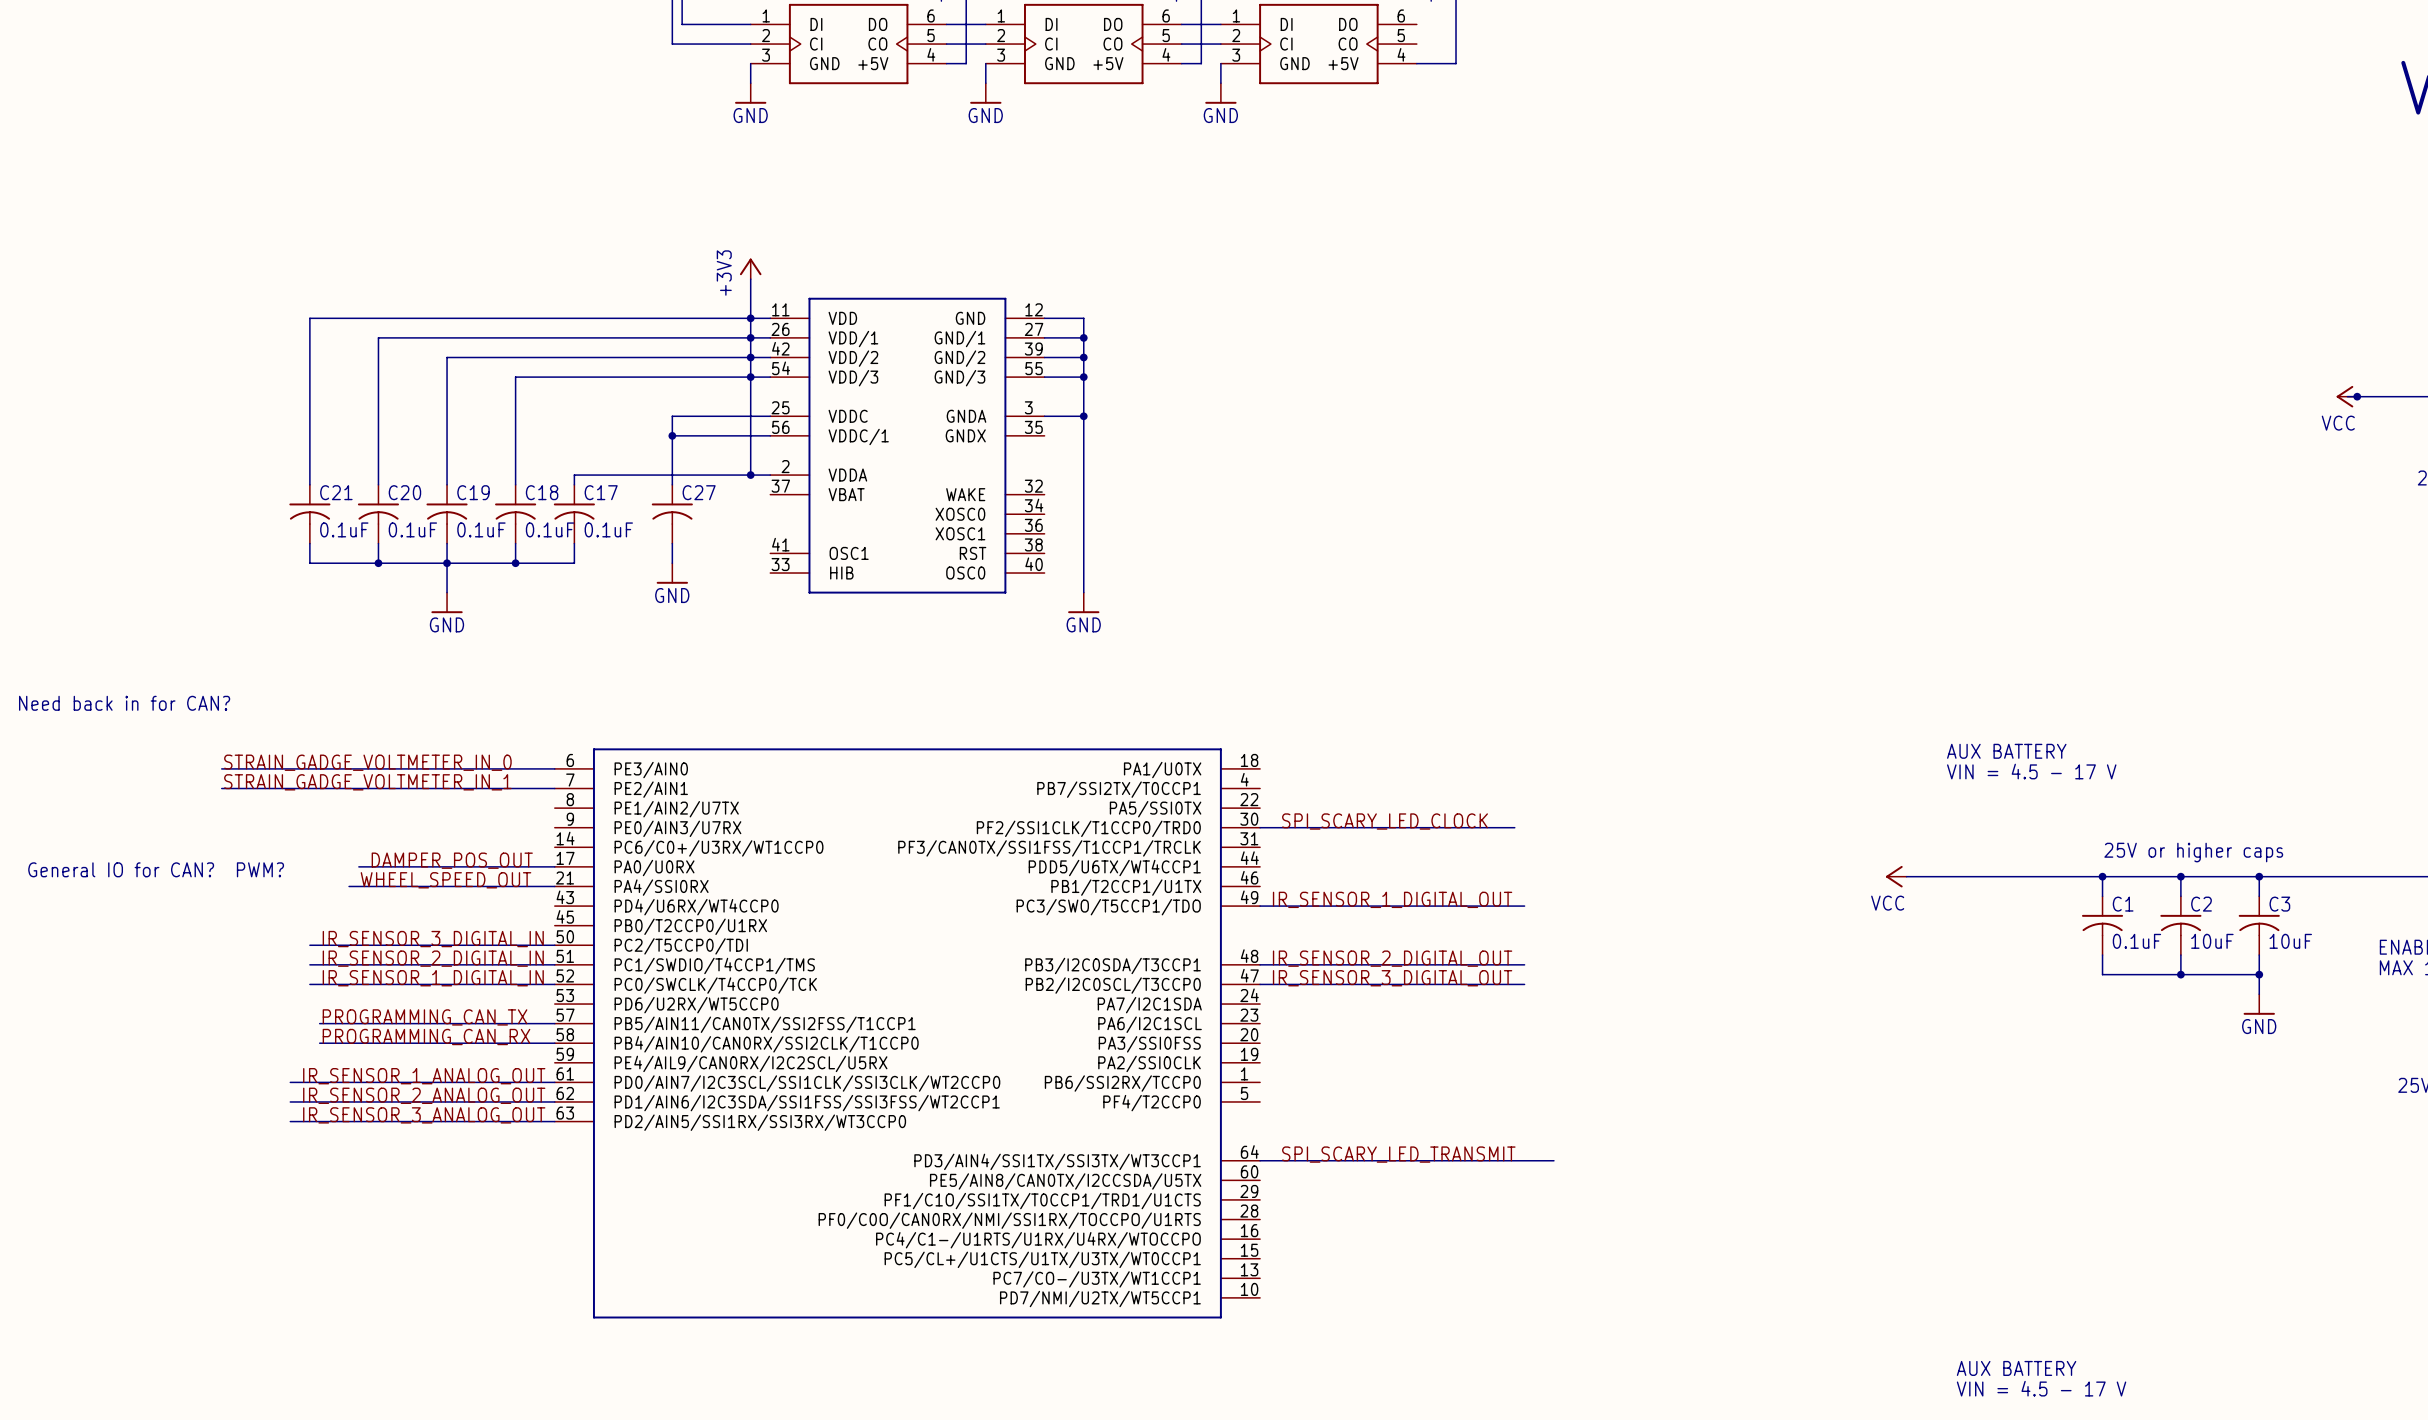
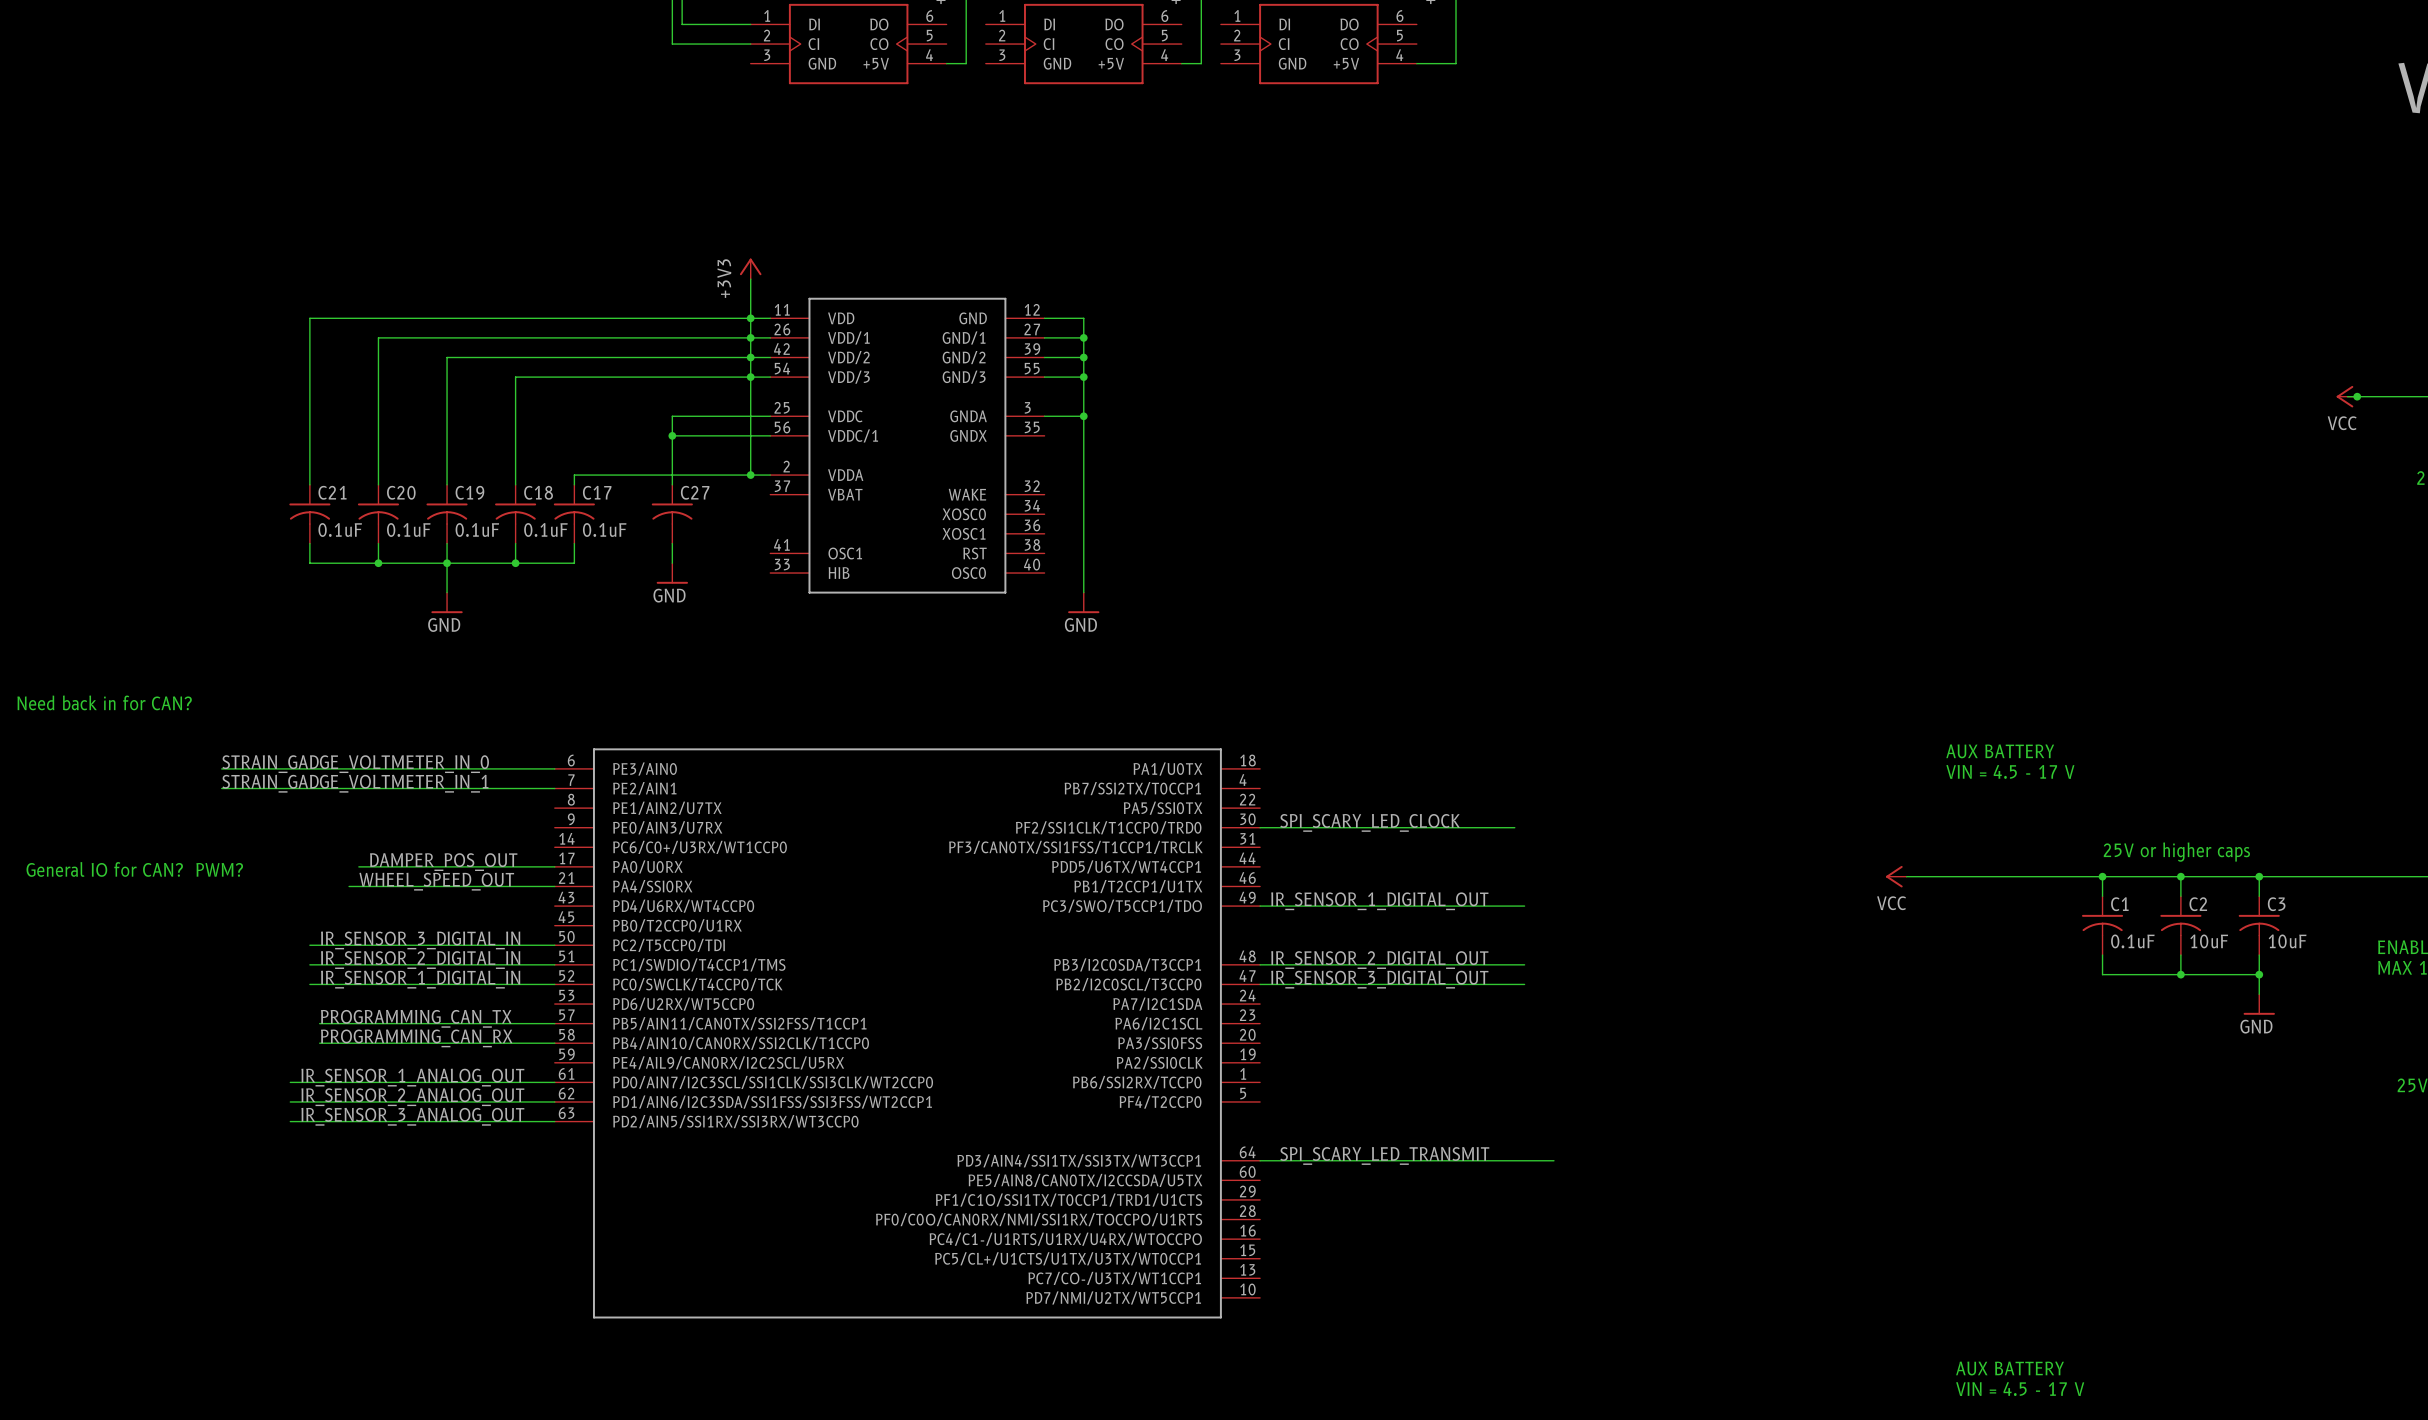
wire: (946, 24) (985, 24) -> none
wire: (1181, 24) (1220, 24) -> none
wire: (946, 44) (985, 44) -> none
wire: (1181, 44) (1220, 44) -> none
wire: (750, 63) (750, 83) -> none
wire: (985, 63) (985, 83) -> none
wire: (1220, 63) (1220, 83) -> none
power symbol: GND (750, 93) -> none
power symbol: GND (985, 93) -> none
power symbol: GND (1220, 93) -> none

